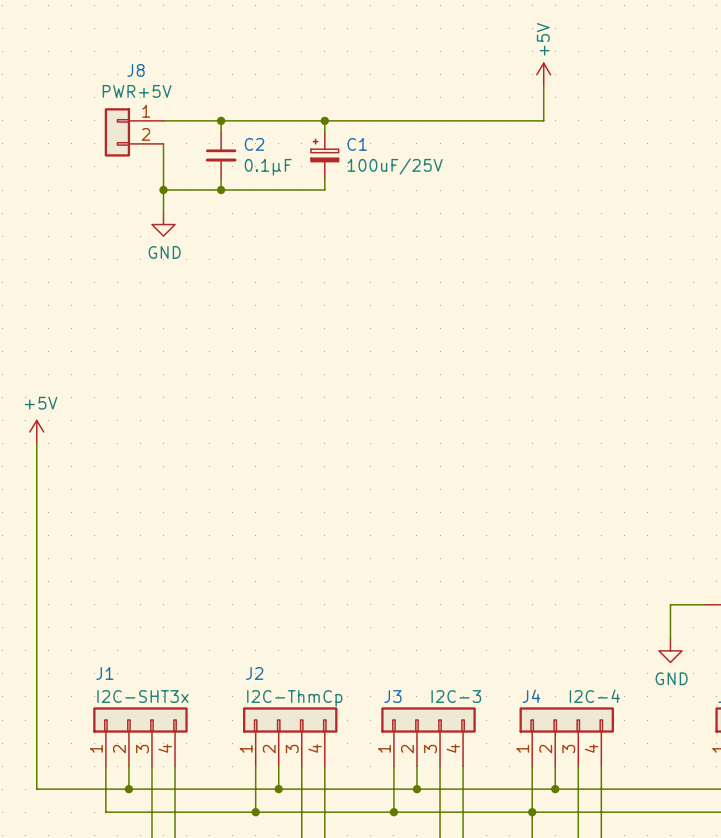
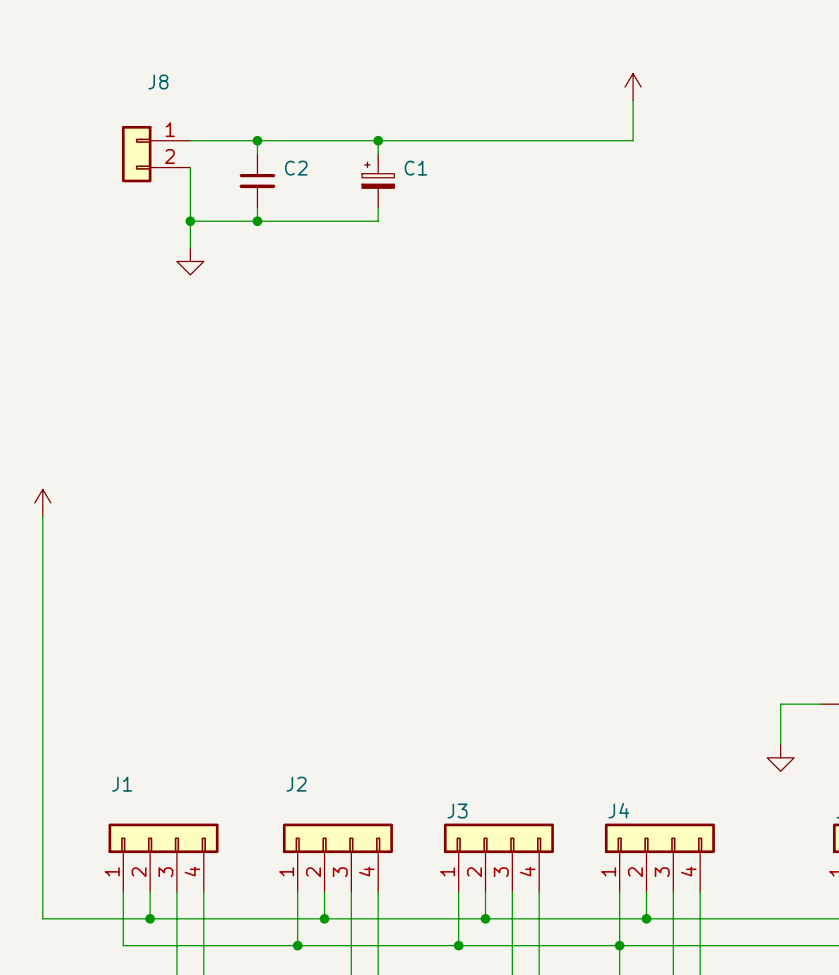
power symbol text: +5V (543, 39) -> none
J8 value: PWR+5V (137, 91) -> none
C1 value: 100uF/25V (395, 166) -> none
C2 value: 0.1μF (268, 167) -> none
power symbol text: GND (164, 252) -> none
power symbol text: +5V (41, 403) -> none
power symbol text: GND (671, 678) -> none
J1 value: I2C-SHT3x (143, 696) -> none
J3 value: I2C-3 (456, 696) -> none
J4 value: I2C-4 (594, 696) -> none
J2 value: I2C-ThmCp (294, 698) -> none

